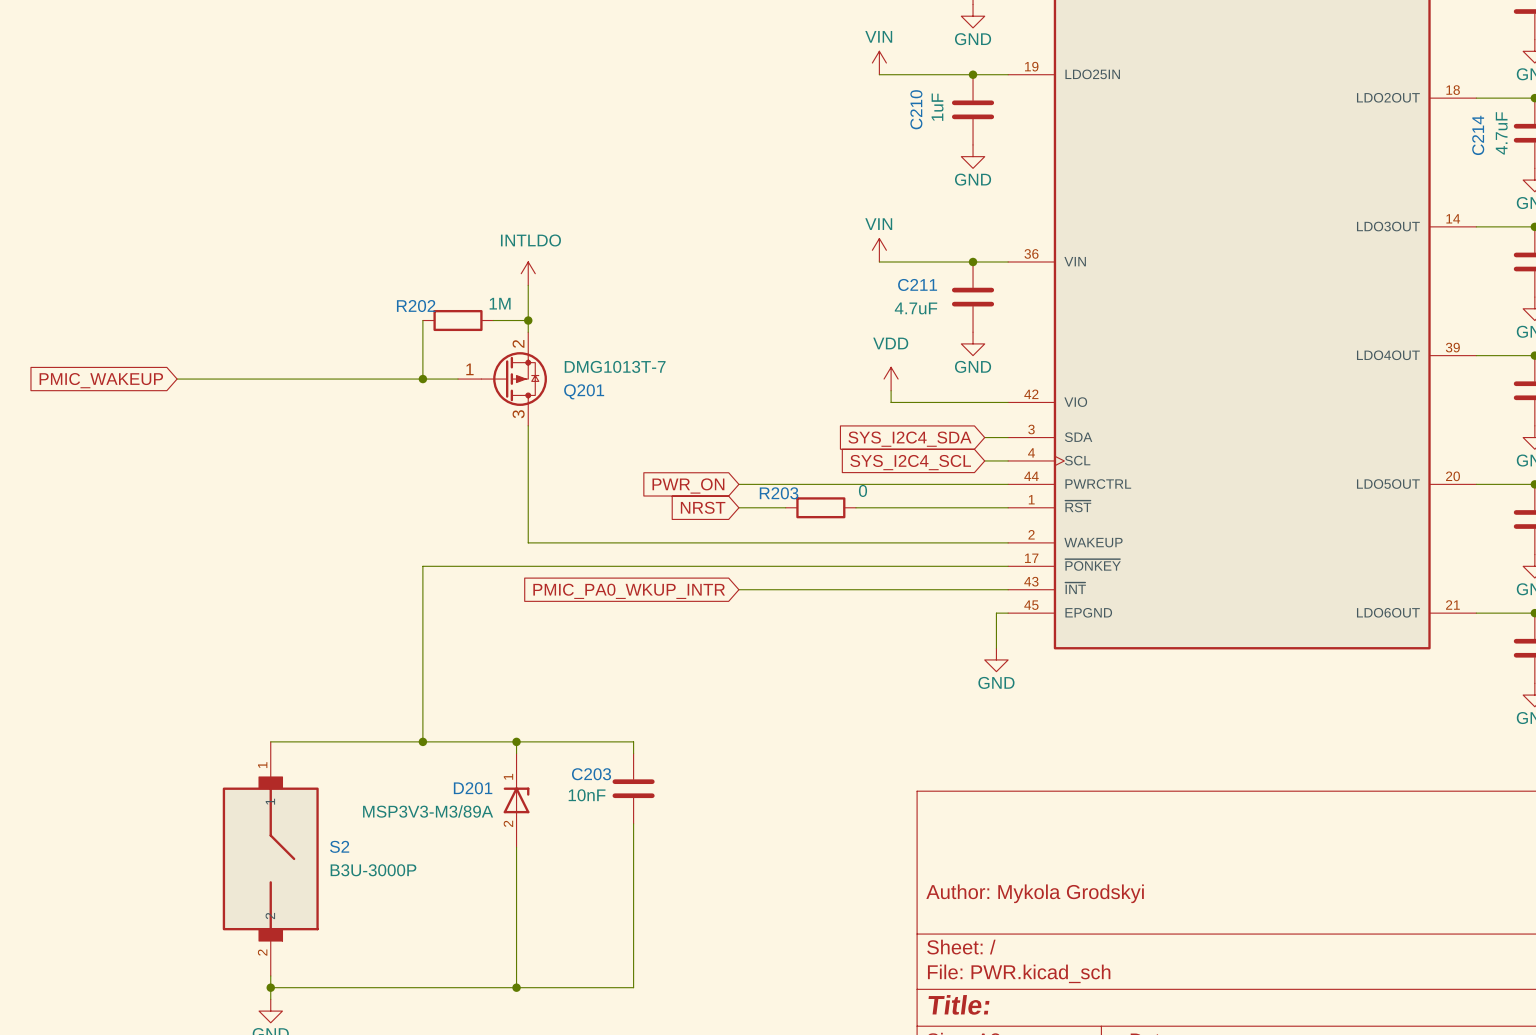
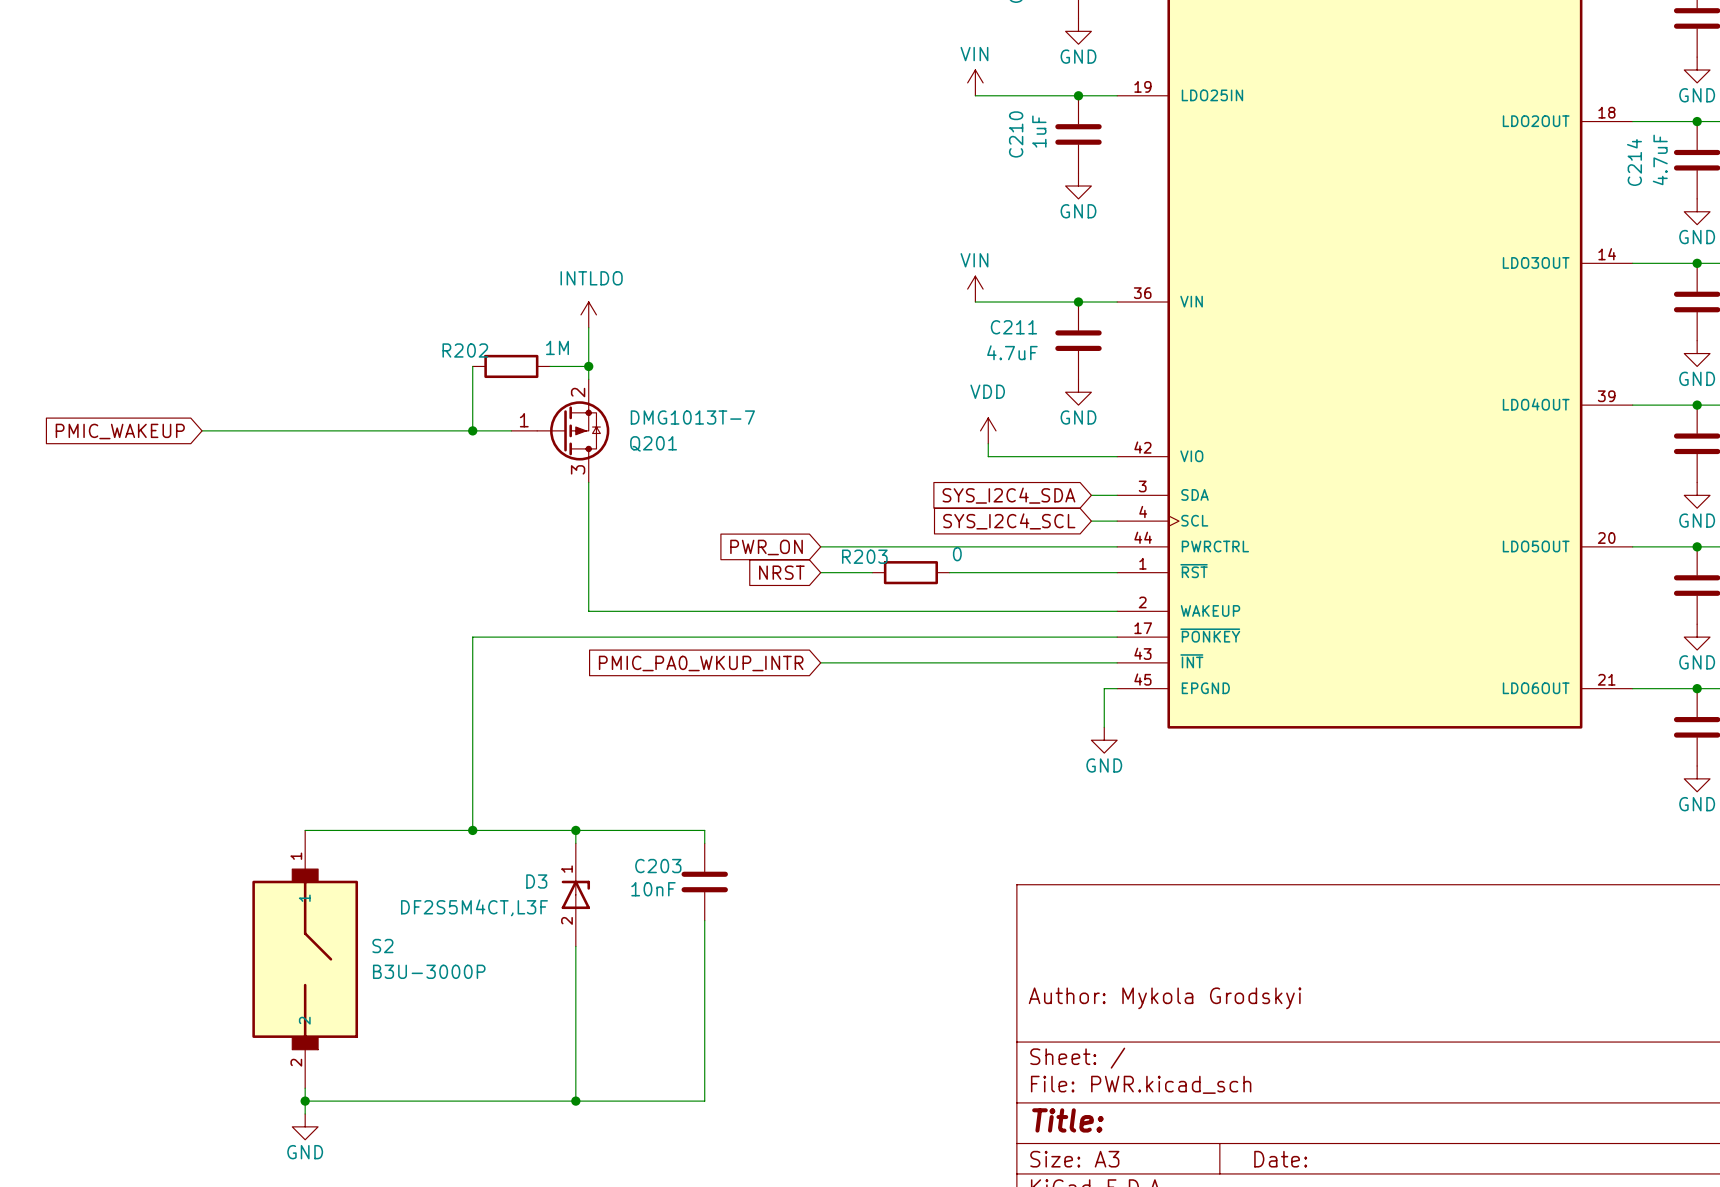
D201 name: D201 (473, 788) -> D3 (536, 881)
D201 value: MSP3V3-M3/89A (428, 811) -> DF2S5M4CT,L3F (474, 907)

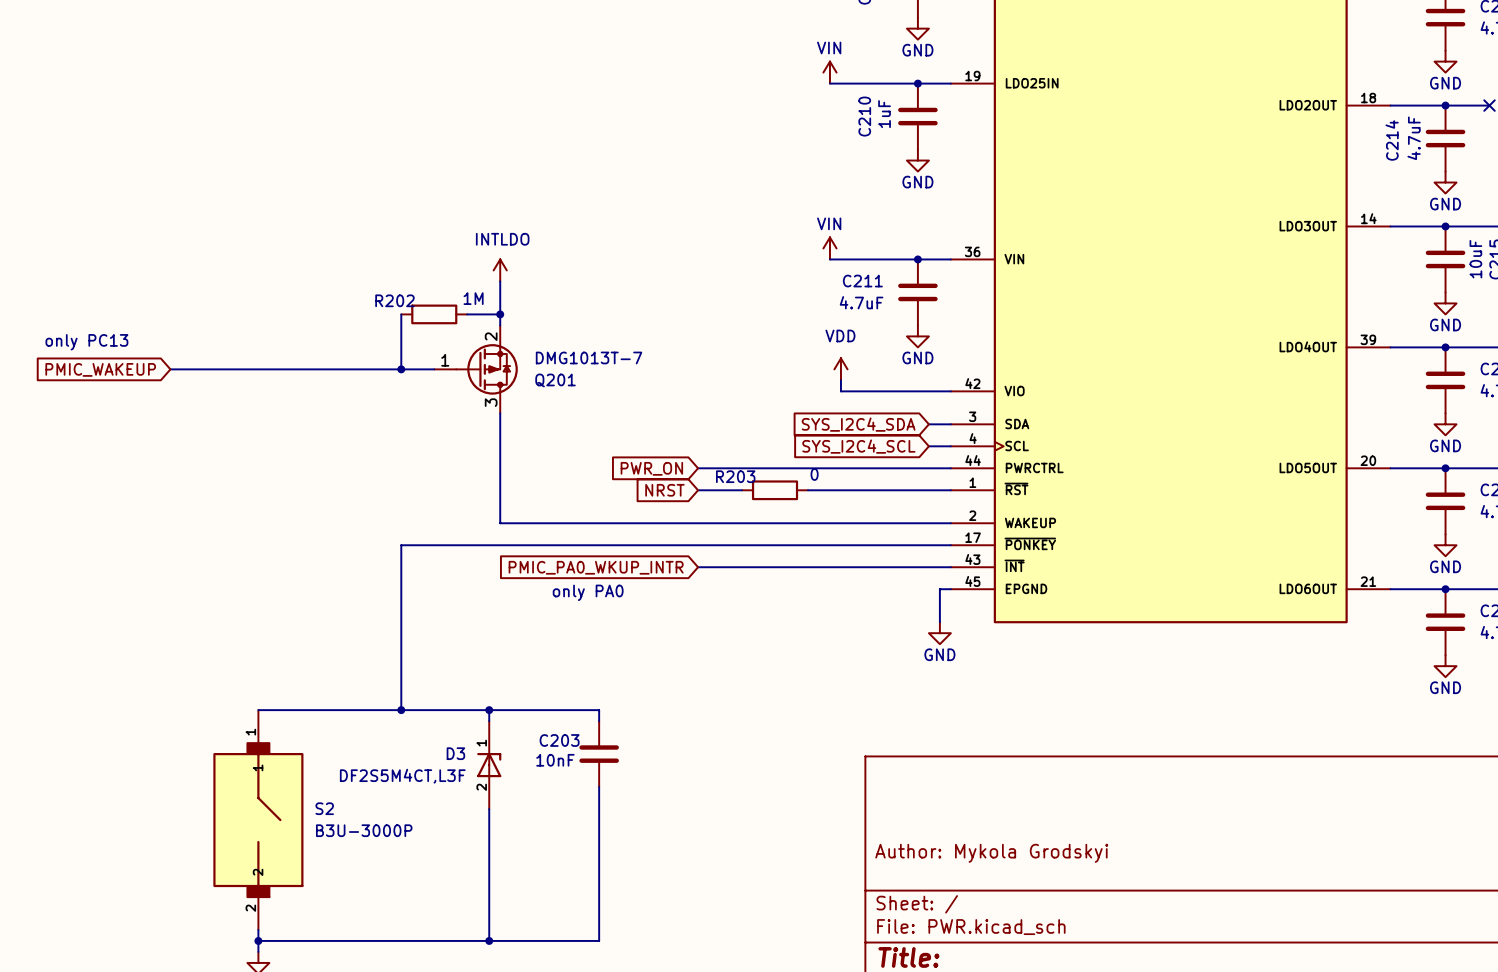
text: none -> only PC13 (86, 342)
text: none -> only PA0 (588, 592)

